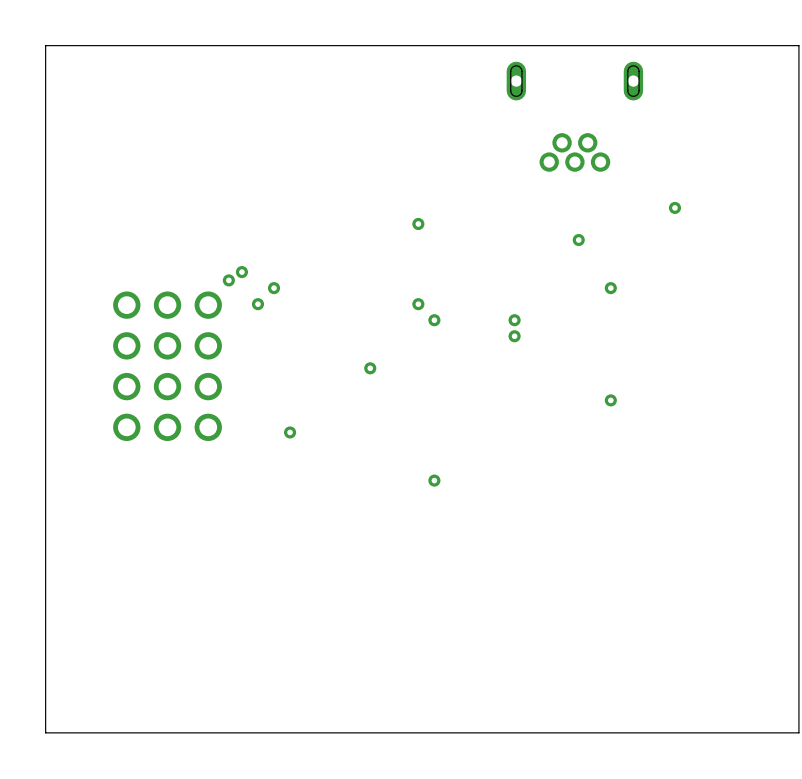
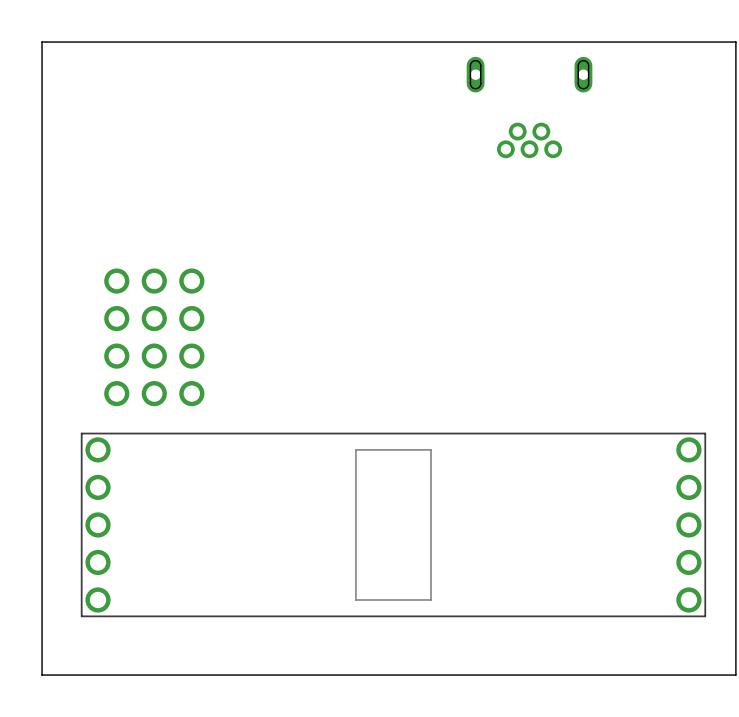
via: (674, 207) -> none
via: (418, 223) -> none
via: (578, 240) -> none
via: (241, 272) -> none
via: (228, 280) -> none
via: (274, 288) -> none
via: (610, 288) -> none
via: (257, 304) -> none
via: (418, 304) -> none
via: (434, 320) -> none
via: (514, 320) -> none
via: (514, 336) -> none
via: (370, 368) -> none
via: (610, 400) -> none
via: (290, 432) -> none
via: (434, 480) -> none
part: none -> (393, 524)

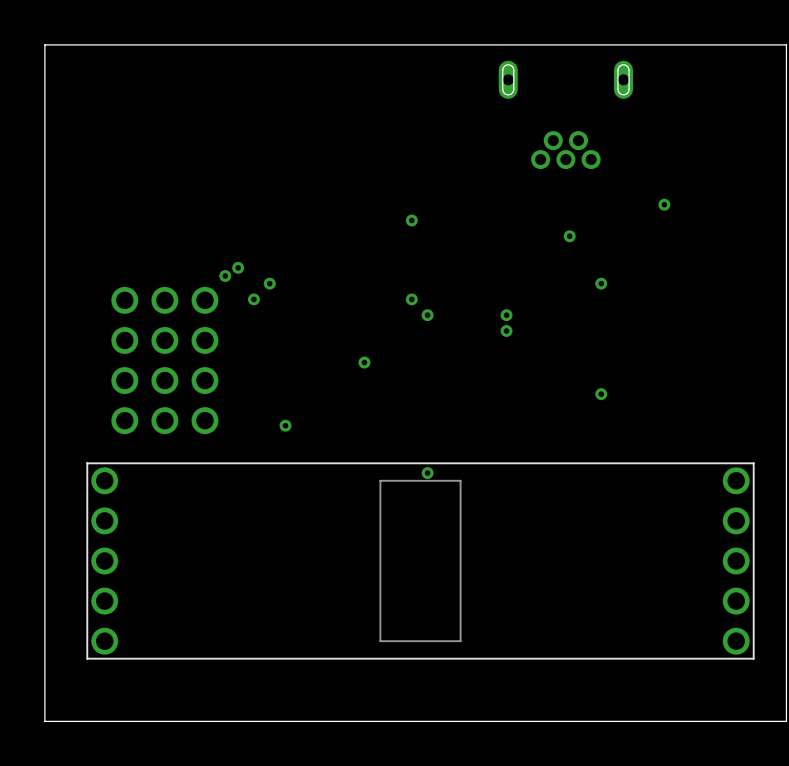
via: none -> (664, 204)
via: none -> (411, 220)
via: none -> (569, 236)
via: none -> (238, 267)
via: none -> (225, 276)
via: none -> (269, 283)
via: none -> (601, 283)
via: none -> (253, 299)
via: none -> (411, 299)
via: none -> (427, 315)
via: none -> (506, 315)
via: none -> (506, 330)
via: none -> (364, 362)
via: none -> (601, 394)
via: none -> (285, 425)
via: none -> (427, 473)

